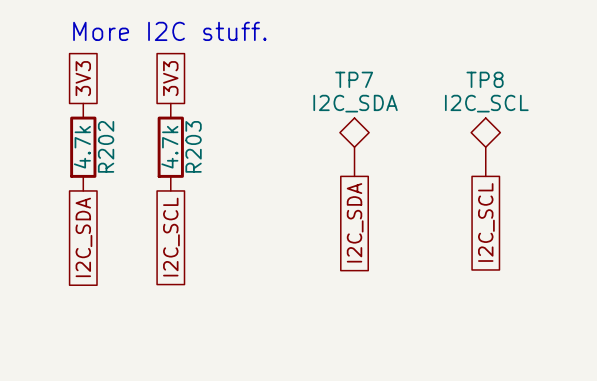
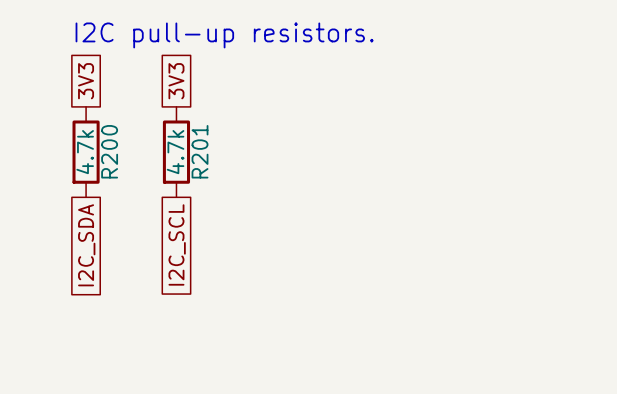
text: More I2C stuff. (169, 31) -> I2C pull-up resistors. (224, 35)
R202 name: R202 (106, 146) -> R200 (109, 151)
R203 name: R203 (193, 146) -> R201 (200, 151)
TP7: I2C_SDA (354, 147) -> none
TP8: I2C_SCL (485, 147) -> none
global label: I2C_SDA (355, 222) -> none
global label: I2C_SCL (486, 222) -> none

